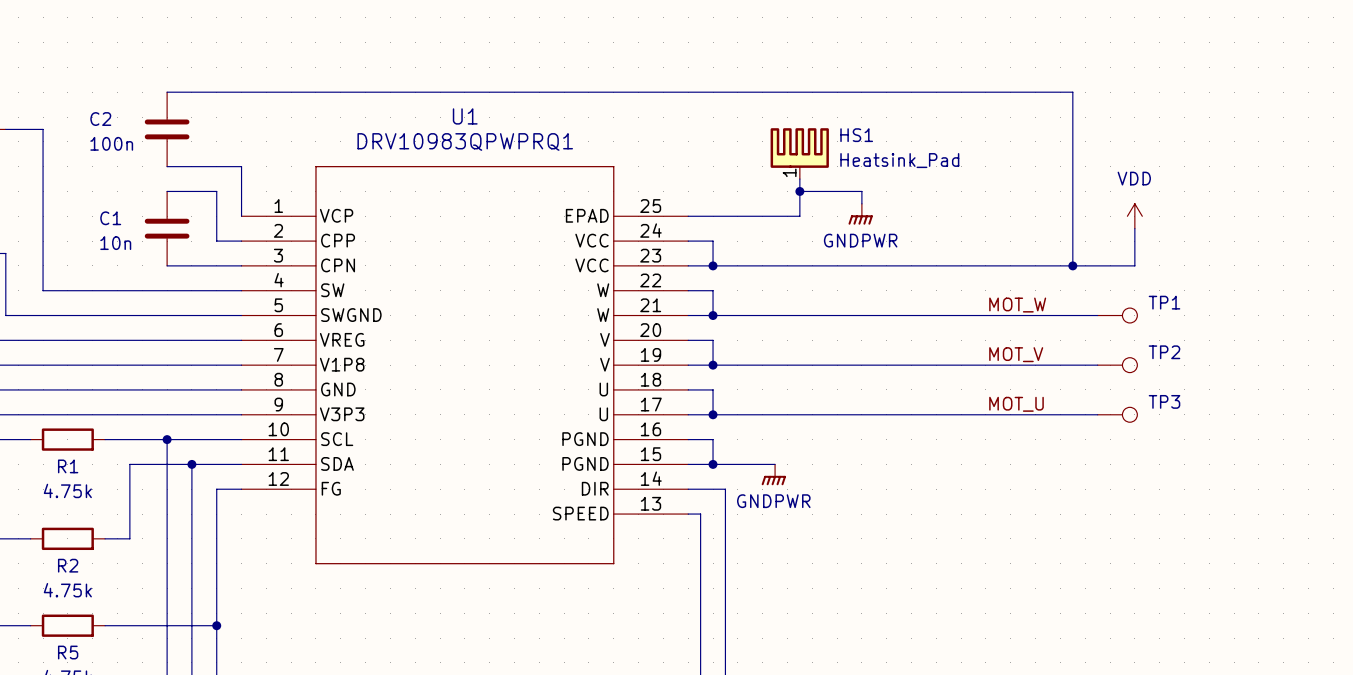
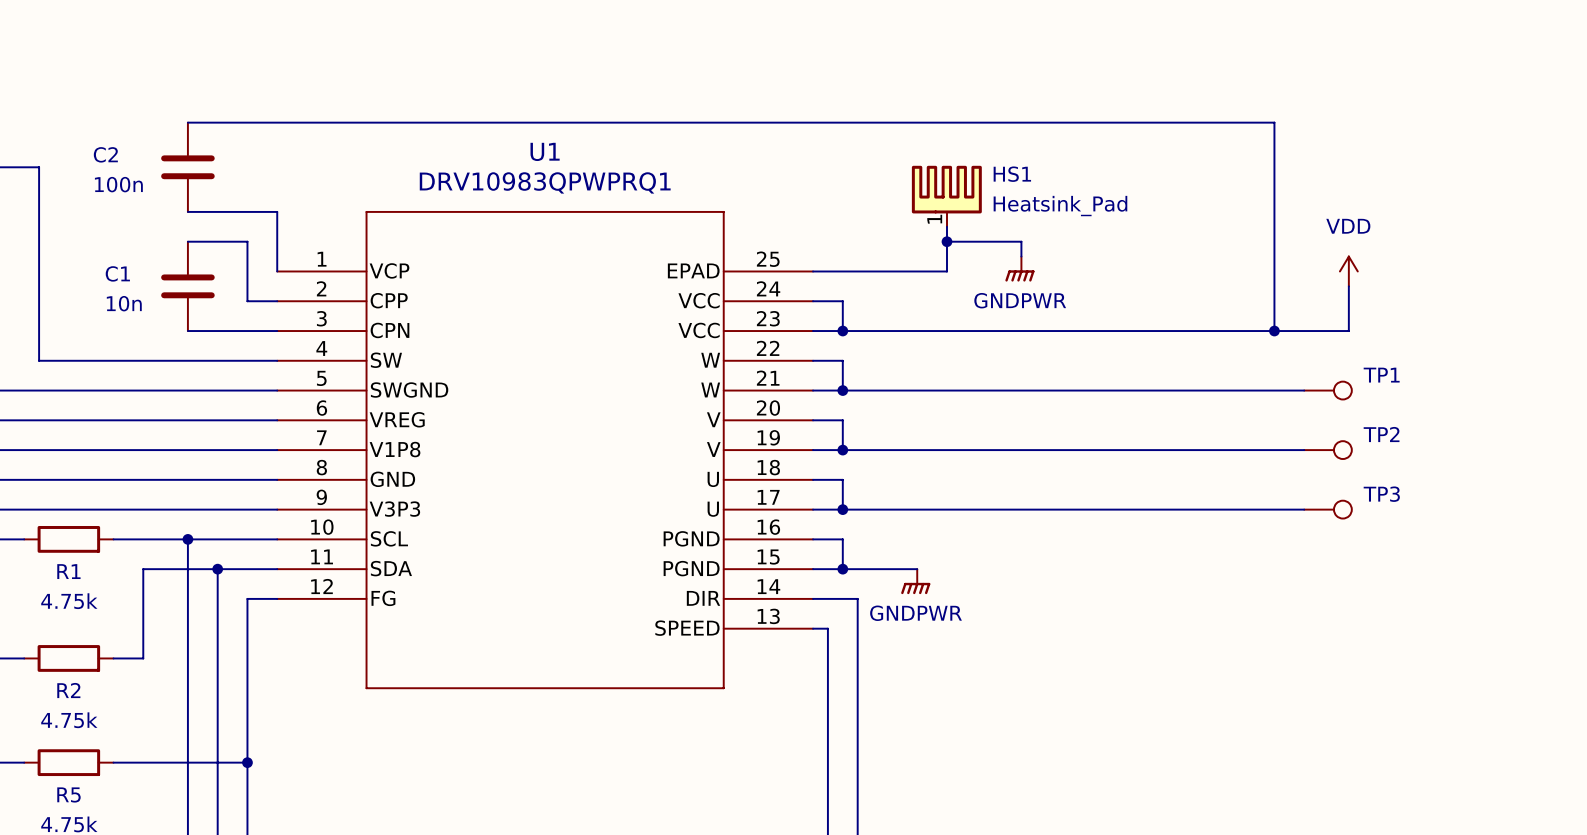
label: MOT_W (1017, 305) -> none
label: MOT_V (1016, 354) -> none
label: MOT_U (1016, 404) -> none

